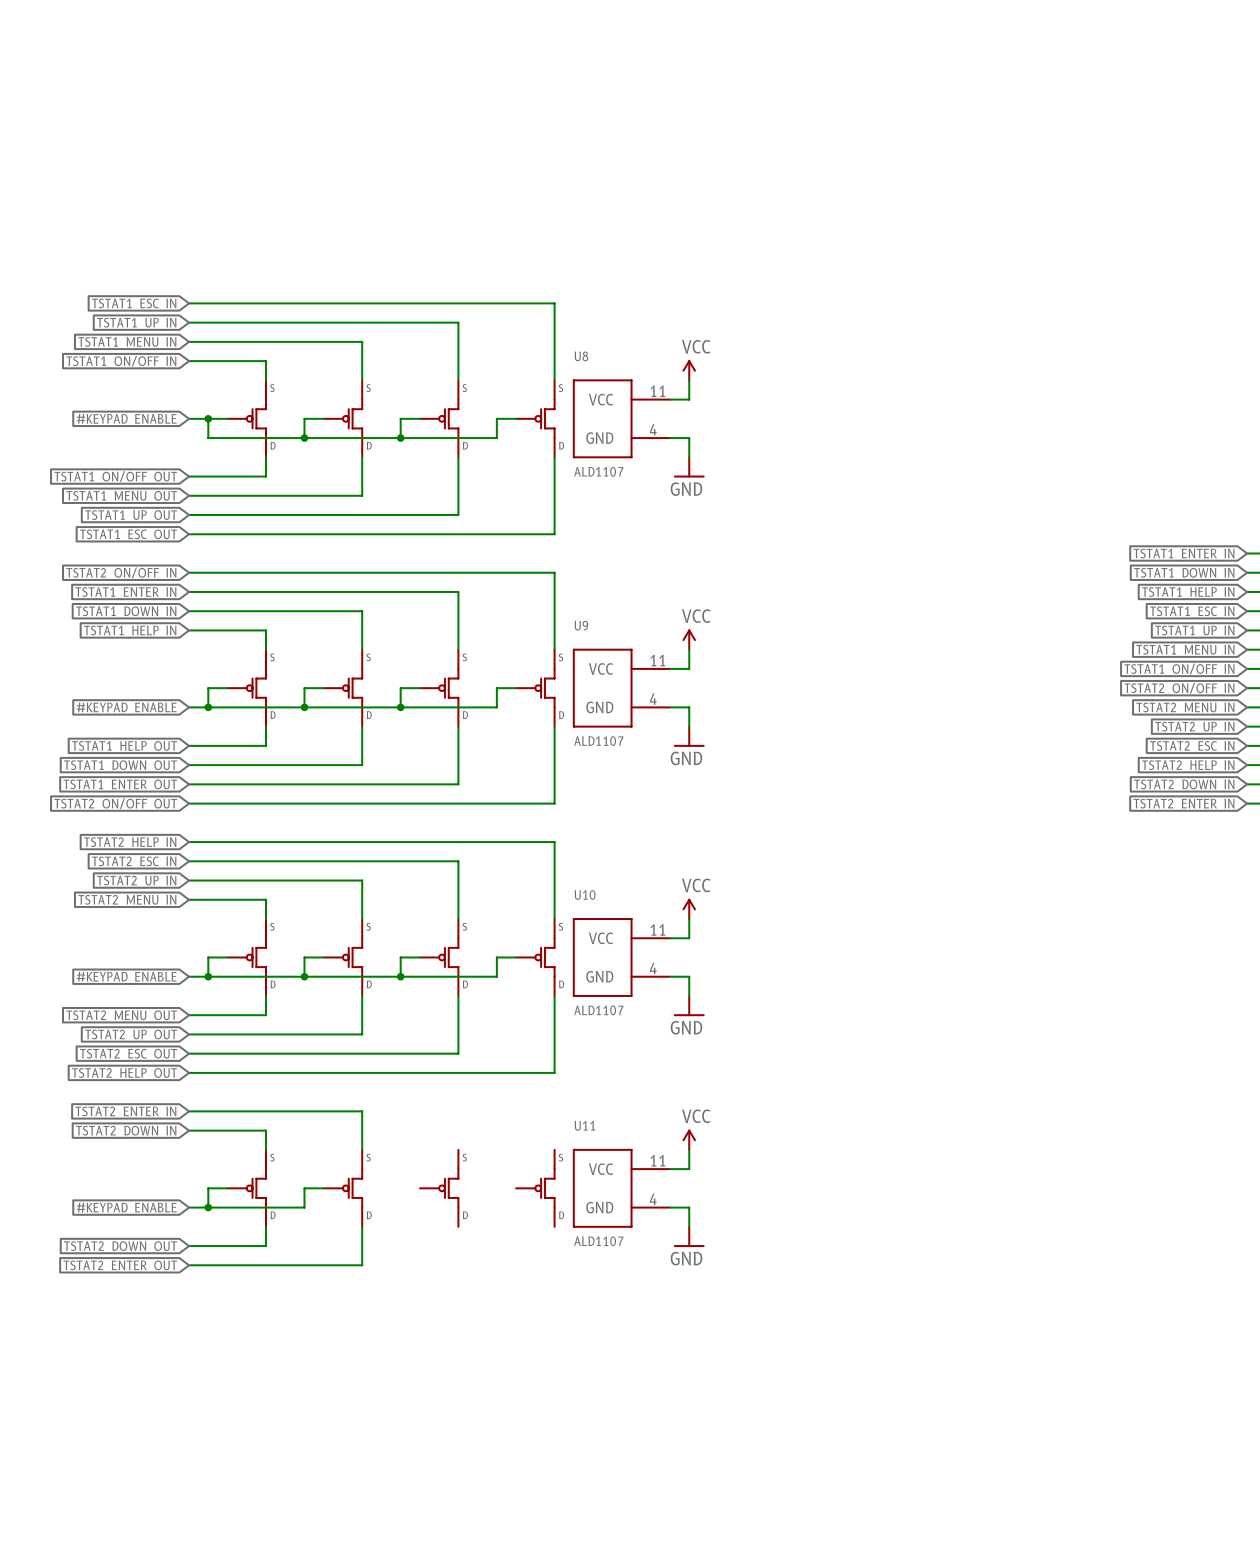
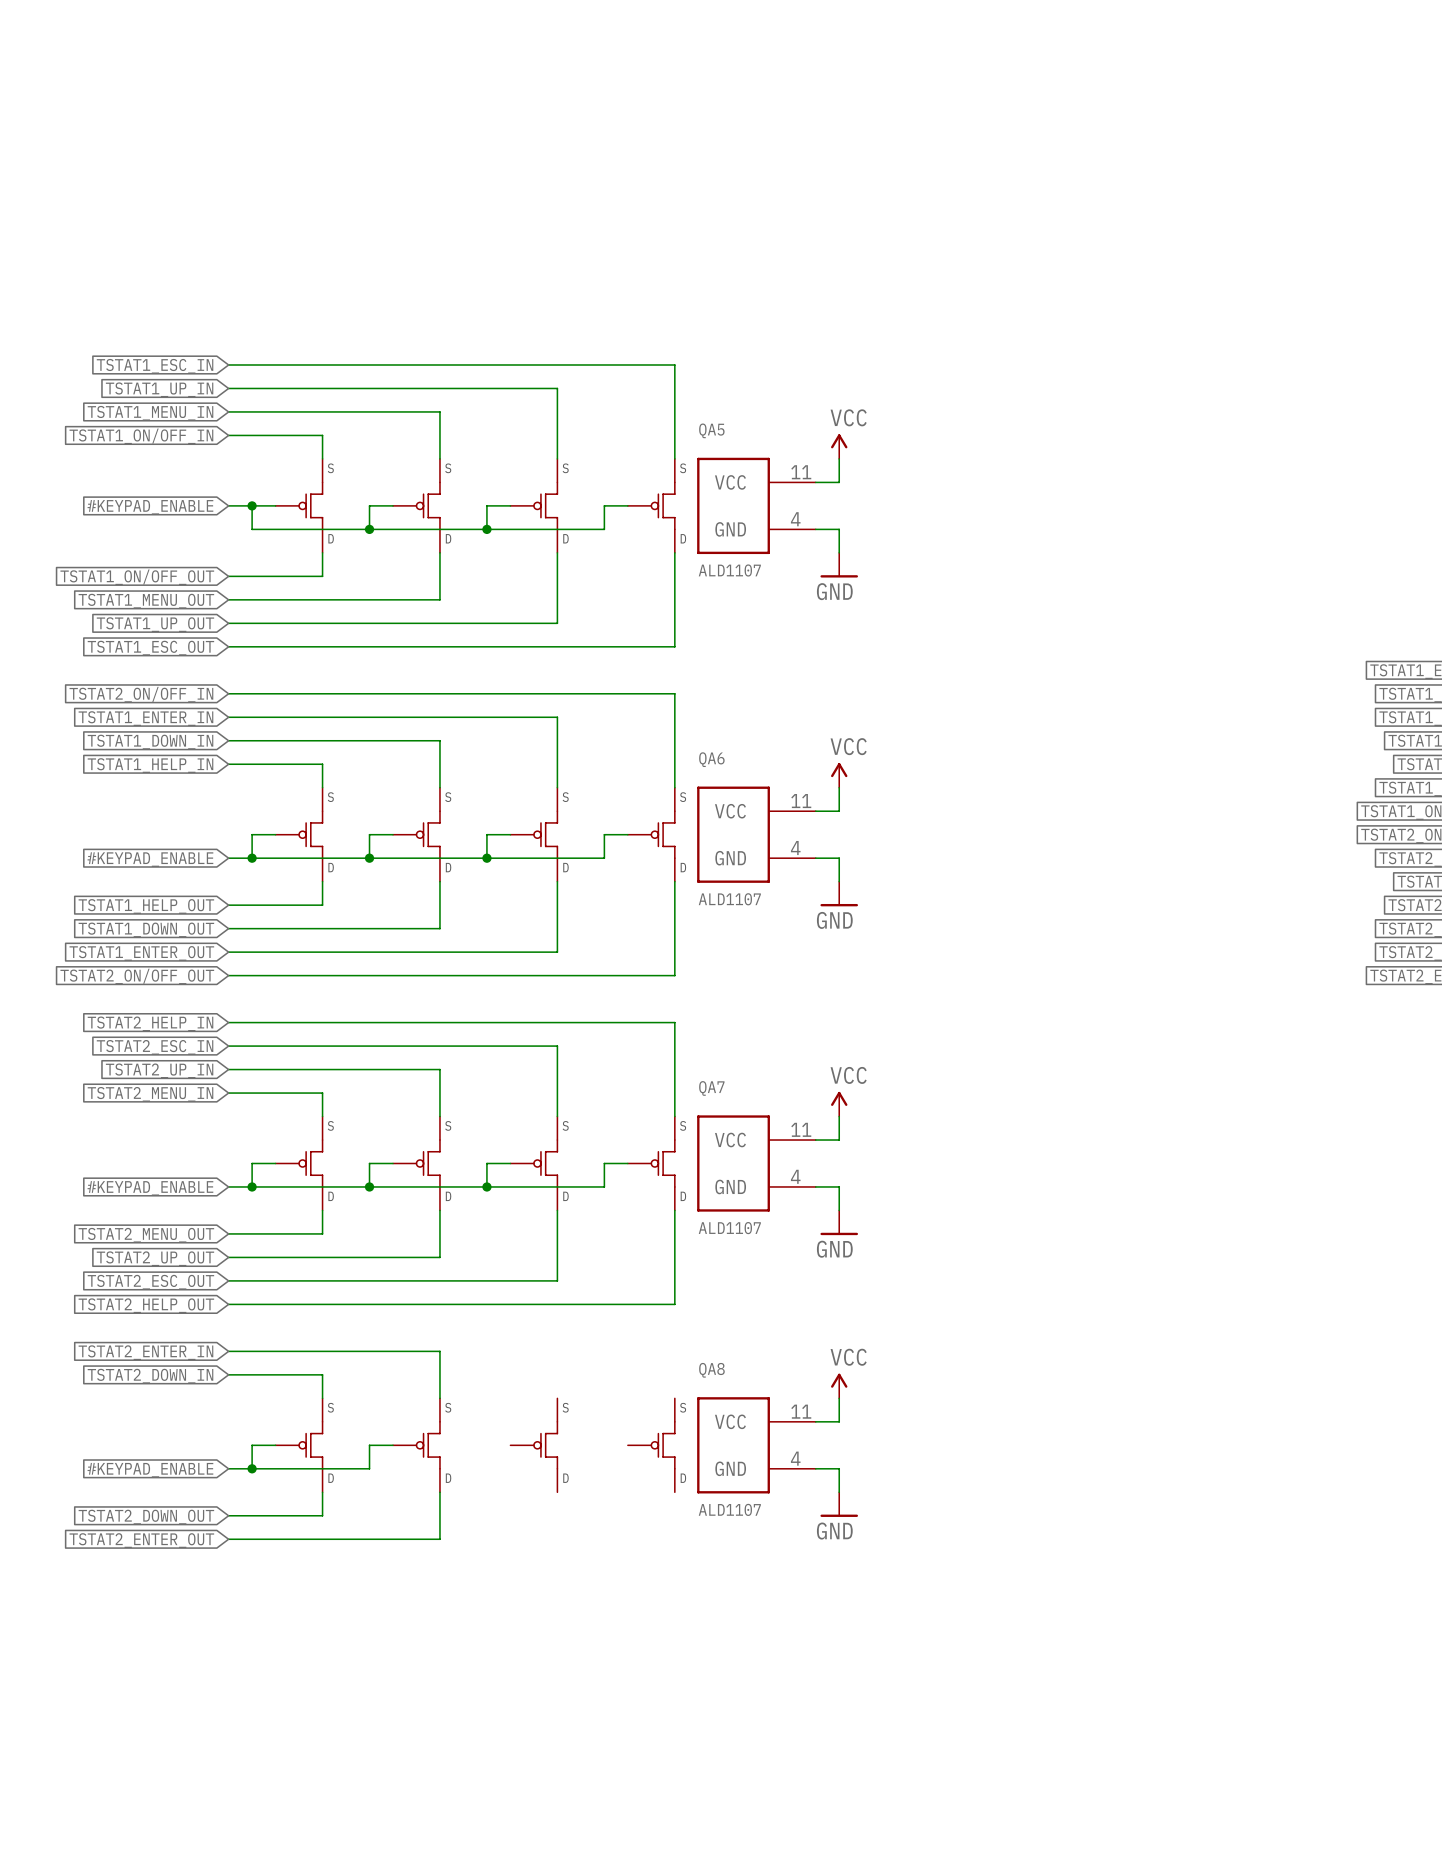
U8 name: U8 (581, 356) -> QA5 (711, 430)
U9 name: U9 (581, 625) -> QA6 (711, 759)
U10 name: U10 (585, 895) -> QA7 (711, 1088)
U11 name: U11 (584, 1125) -> QA8 (711, 1370)

